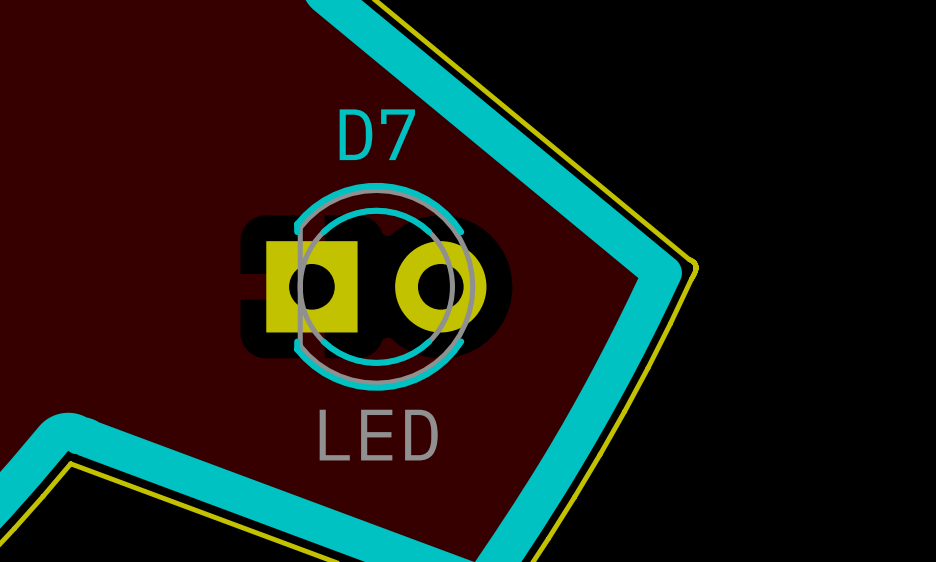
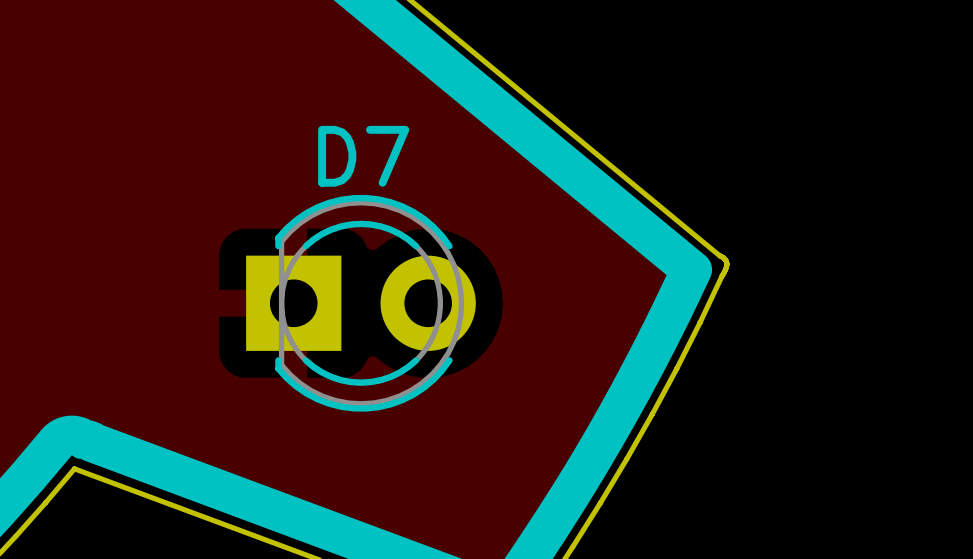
D7 name position: D7 (377, 134) -> D7 (363, 156)
D7 position: (376, 286) -> (360, 303)
D7 value: LED (378, 435) -> none

